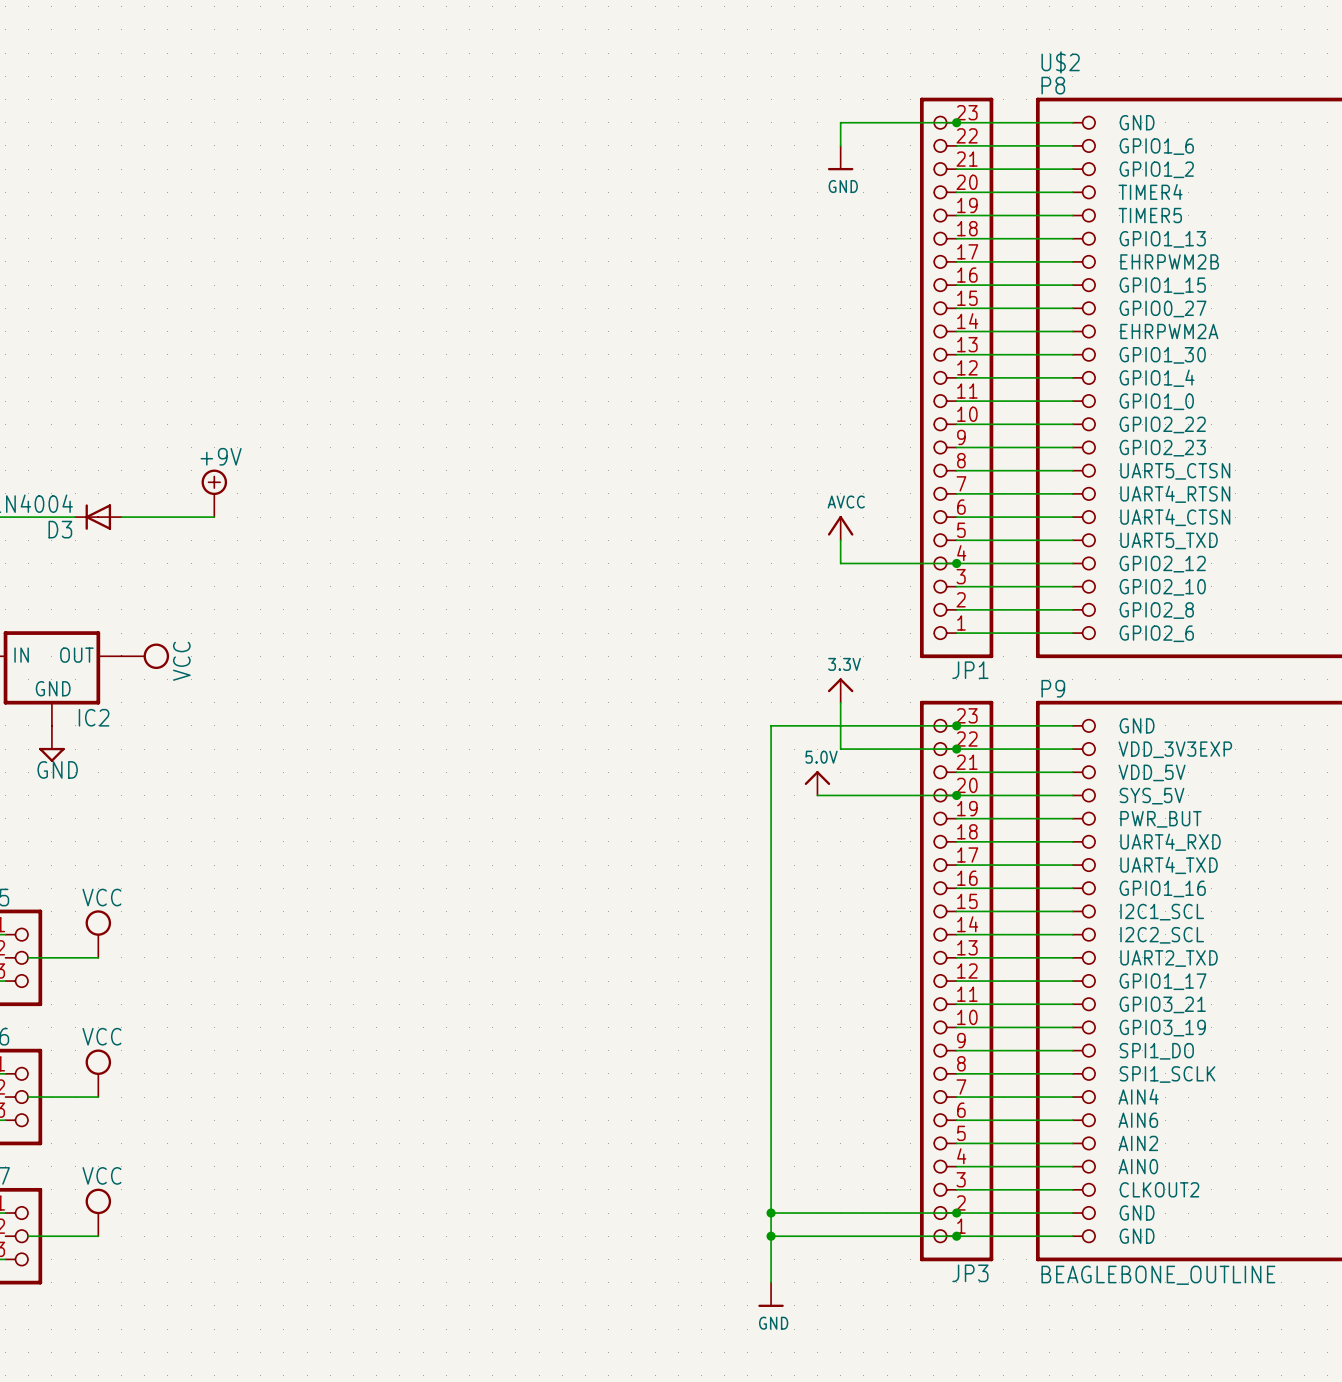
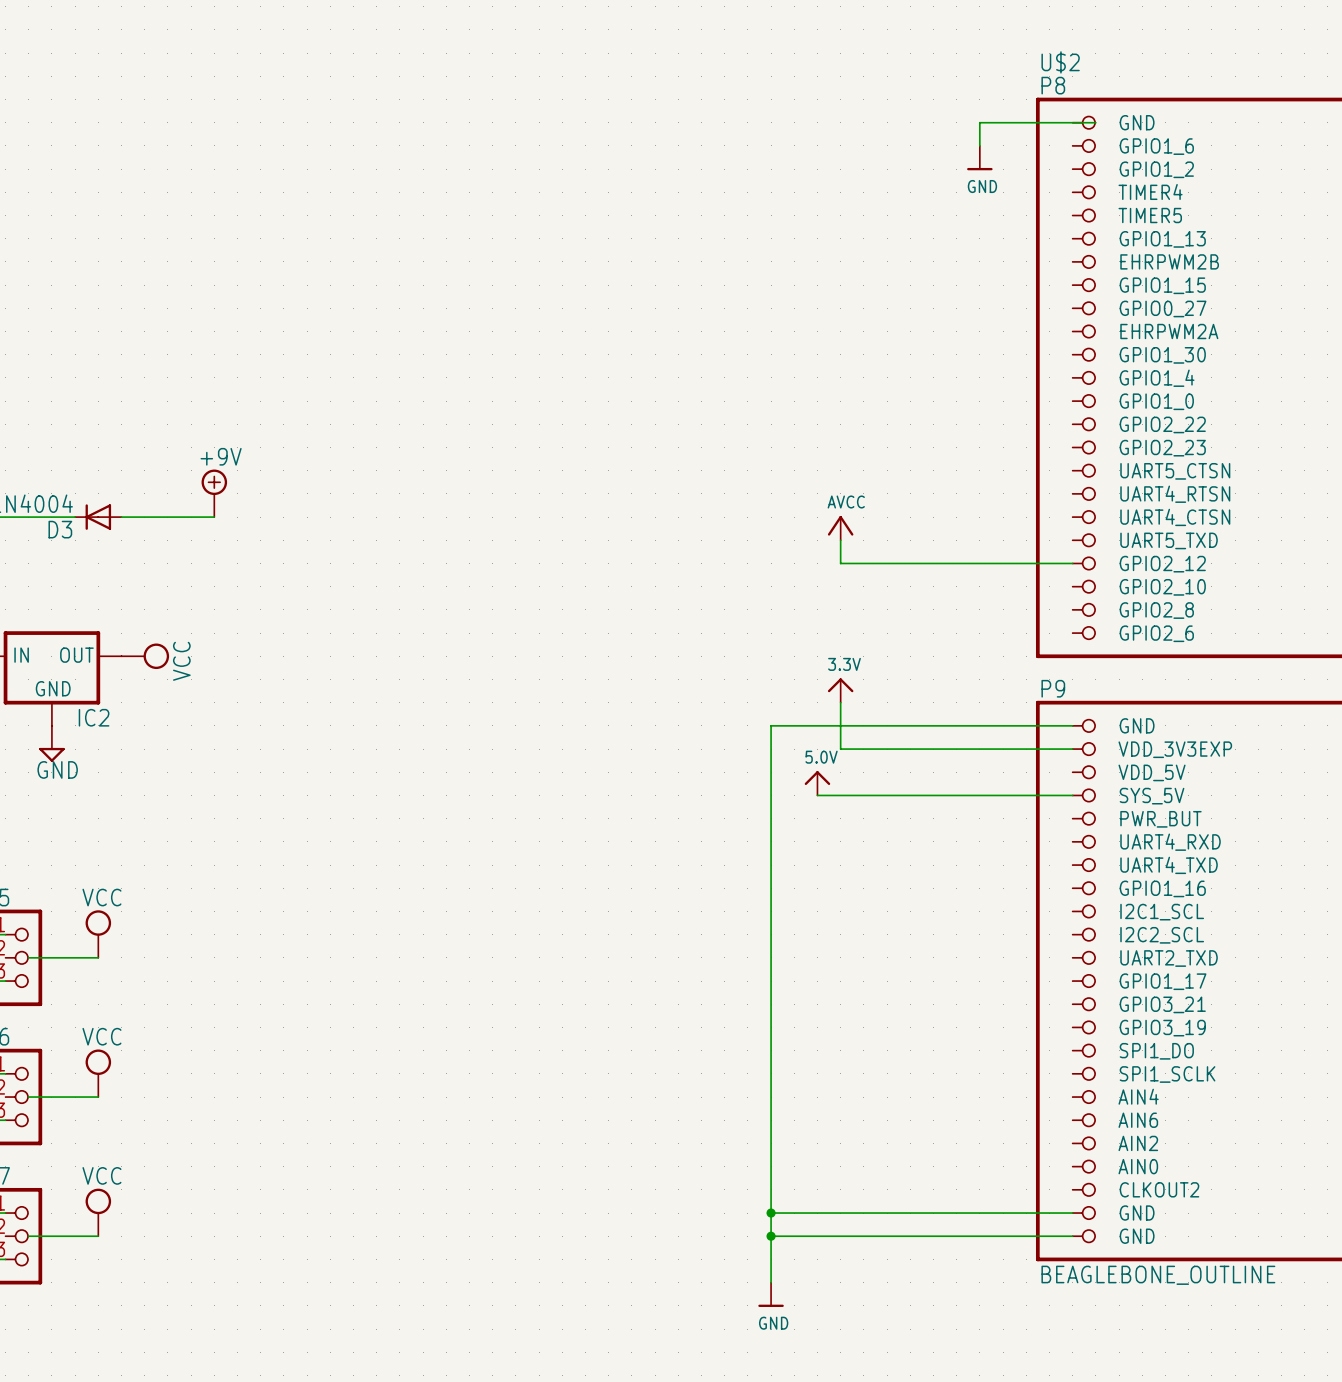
junction: (956, 122) -> none
wire: (979, 122) (840, 122) (840, 145) -> (979, 122) (979, 145)
wire: none -> (1072, 122) (1095, 122)
wire: (956, 145) (1072, 145) -> none
power symbol position: GND (840, 158) -> GND (979, 158)
wire: (956, 169) (1072, 169) -> none
wire: (956, 192) (1072, 192) -> none
wire: (956, 215) (1072, 215) -> none
wire: (956, 238) (1072, 238) -> none
wire: (956, 261) (1072, 261) -> none
wire: (956, 285) (1072, 285) -> none
wire: (956, 308) (1072, 308) -> none
wire: (956, 331) (1072, 331) -> none
wire: (956, 354) (1072, 354) -> none
wire: (956, 377) (1072, 377) -> none
JP1: (956, 377) -> none
wire: (956, 401) (1072, 401) -> none
wire: (956, 424) (1072, 424) -> none
wire: (956, 447) (1072, 447) -> none
wire: (956, 470) (1072, 470) -> none
wire: (956, 493) (1072, 493) -> none
wire: (956, 517) (1072, 517) -> none
wire: (956, 540) (1072, 540) -> none
junction: (956, 563) -> none
wire: (956, 586) (1072, 586) -> none
wire: (956, 609) (1072, 609) -> none
wire: (956, 633) (1072, 633) -> none
junction: (956, 725) -> none
junction: (956, 749) -> none
wire: (956, 772) (1072, 772) -> none
junction: (956, 795) -> none
wire: (956, 818) (1072, 818) -> none
wire: (956, 841) (1072, 841) -> none
wire: (956, 865) (1072, 865) -> none
wire: (956, 888) (1072, 888) -> none
wire: (956, 911) (1072, 911) -> none
wire: (956, 934) (1072, 934) -> none
wire: (956, 957) (1072, 957) -> none
wire: (956, 981) (1072, 981) -> none
JP3: (956, 981) -> none
wire: (956, 1004) (1072, 1004) -> none
wire: (956, 1027) (1072, 1027) -> none
wire: (956, 1050) (1072, 1050) -> none
wire: (956, 1073) (1072, 1073) -> none
wire: (956, 1097) (1072, 1097) -> none
wire: (956, 1120) (1072, 1120) -> none
wire: (956, 1143) (1072, 1143) -> none
wire: (956, 1166) (1072, 1166) -> none
wire: (956, 1189) (1072, 1189) -> none
junction: (956, 1213) -> none
junction: (956, 1236) -> none

